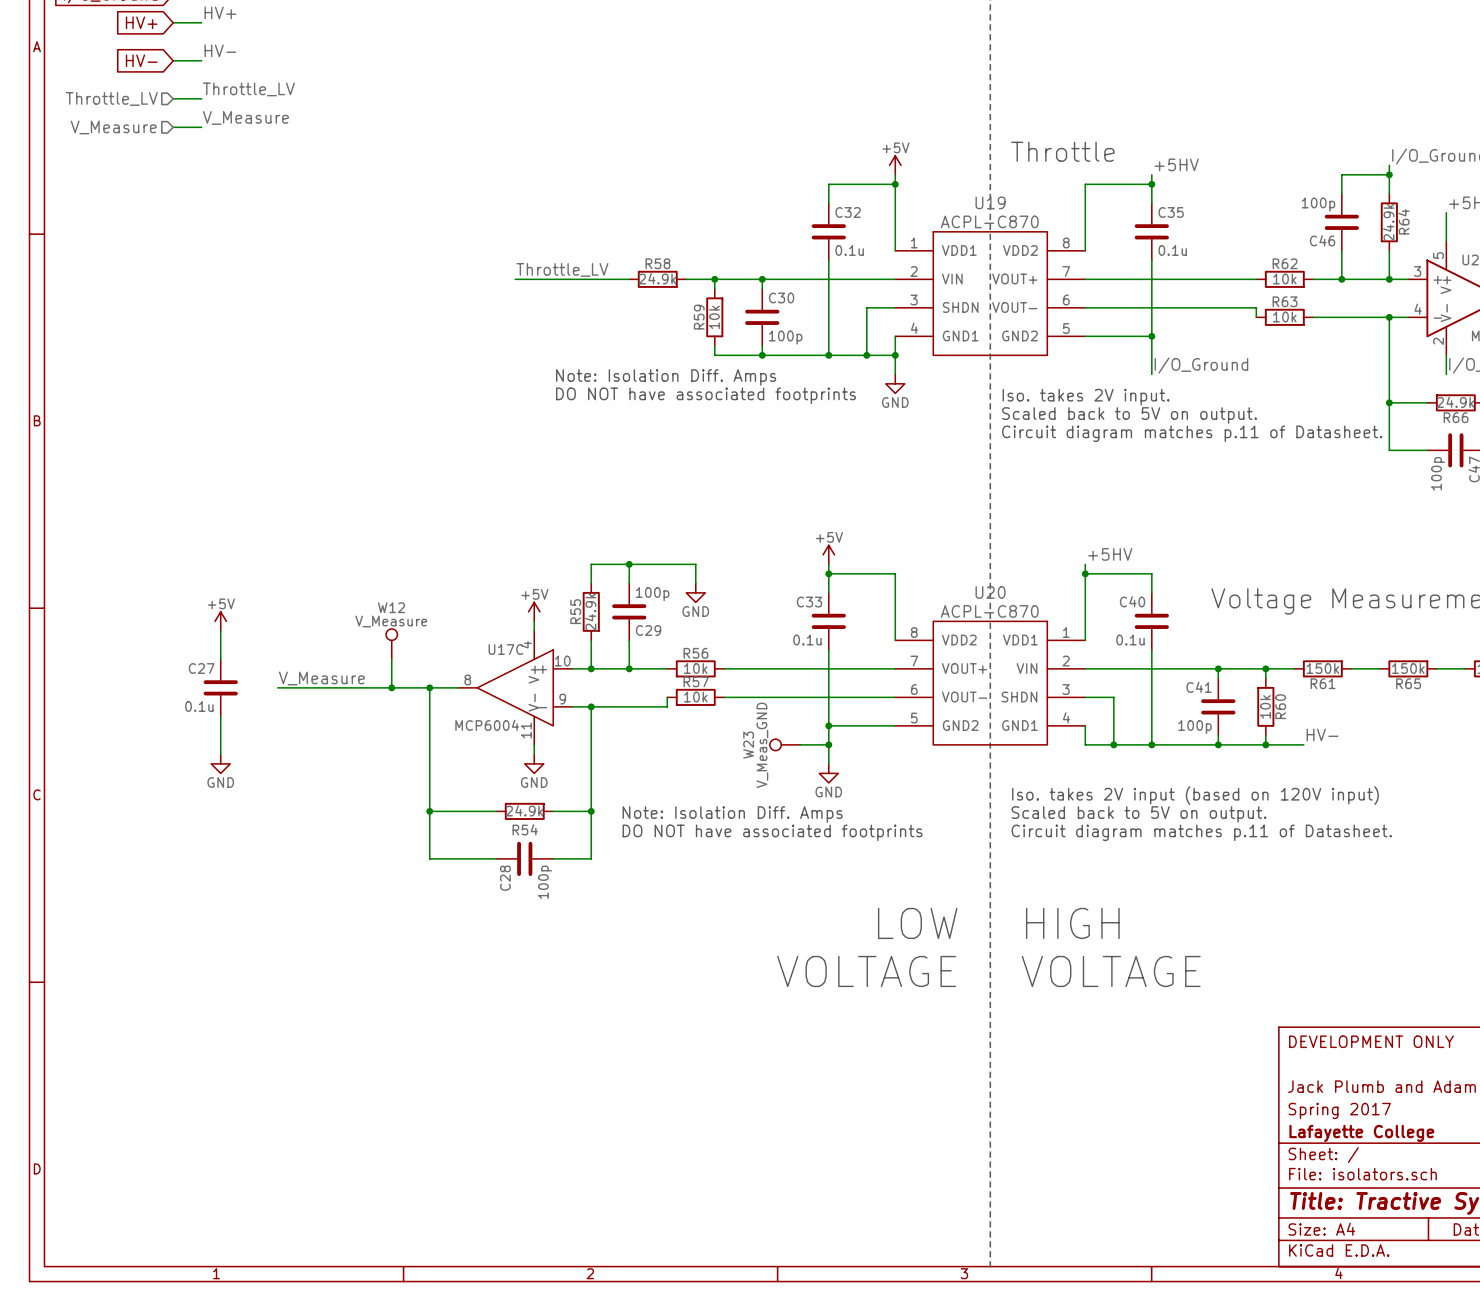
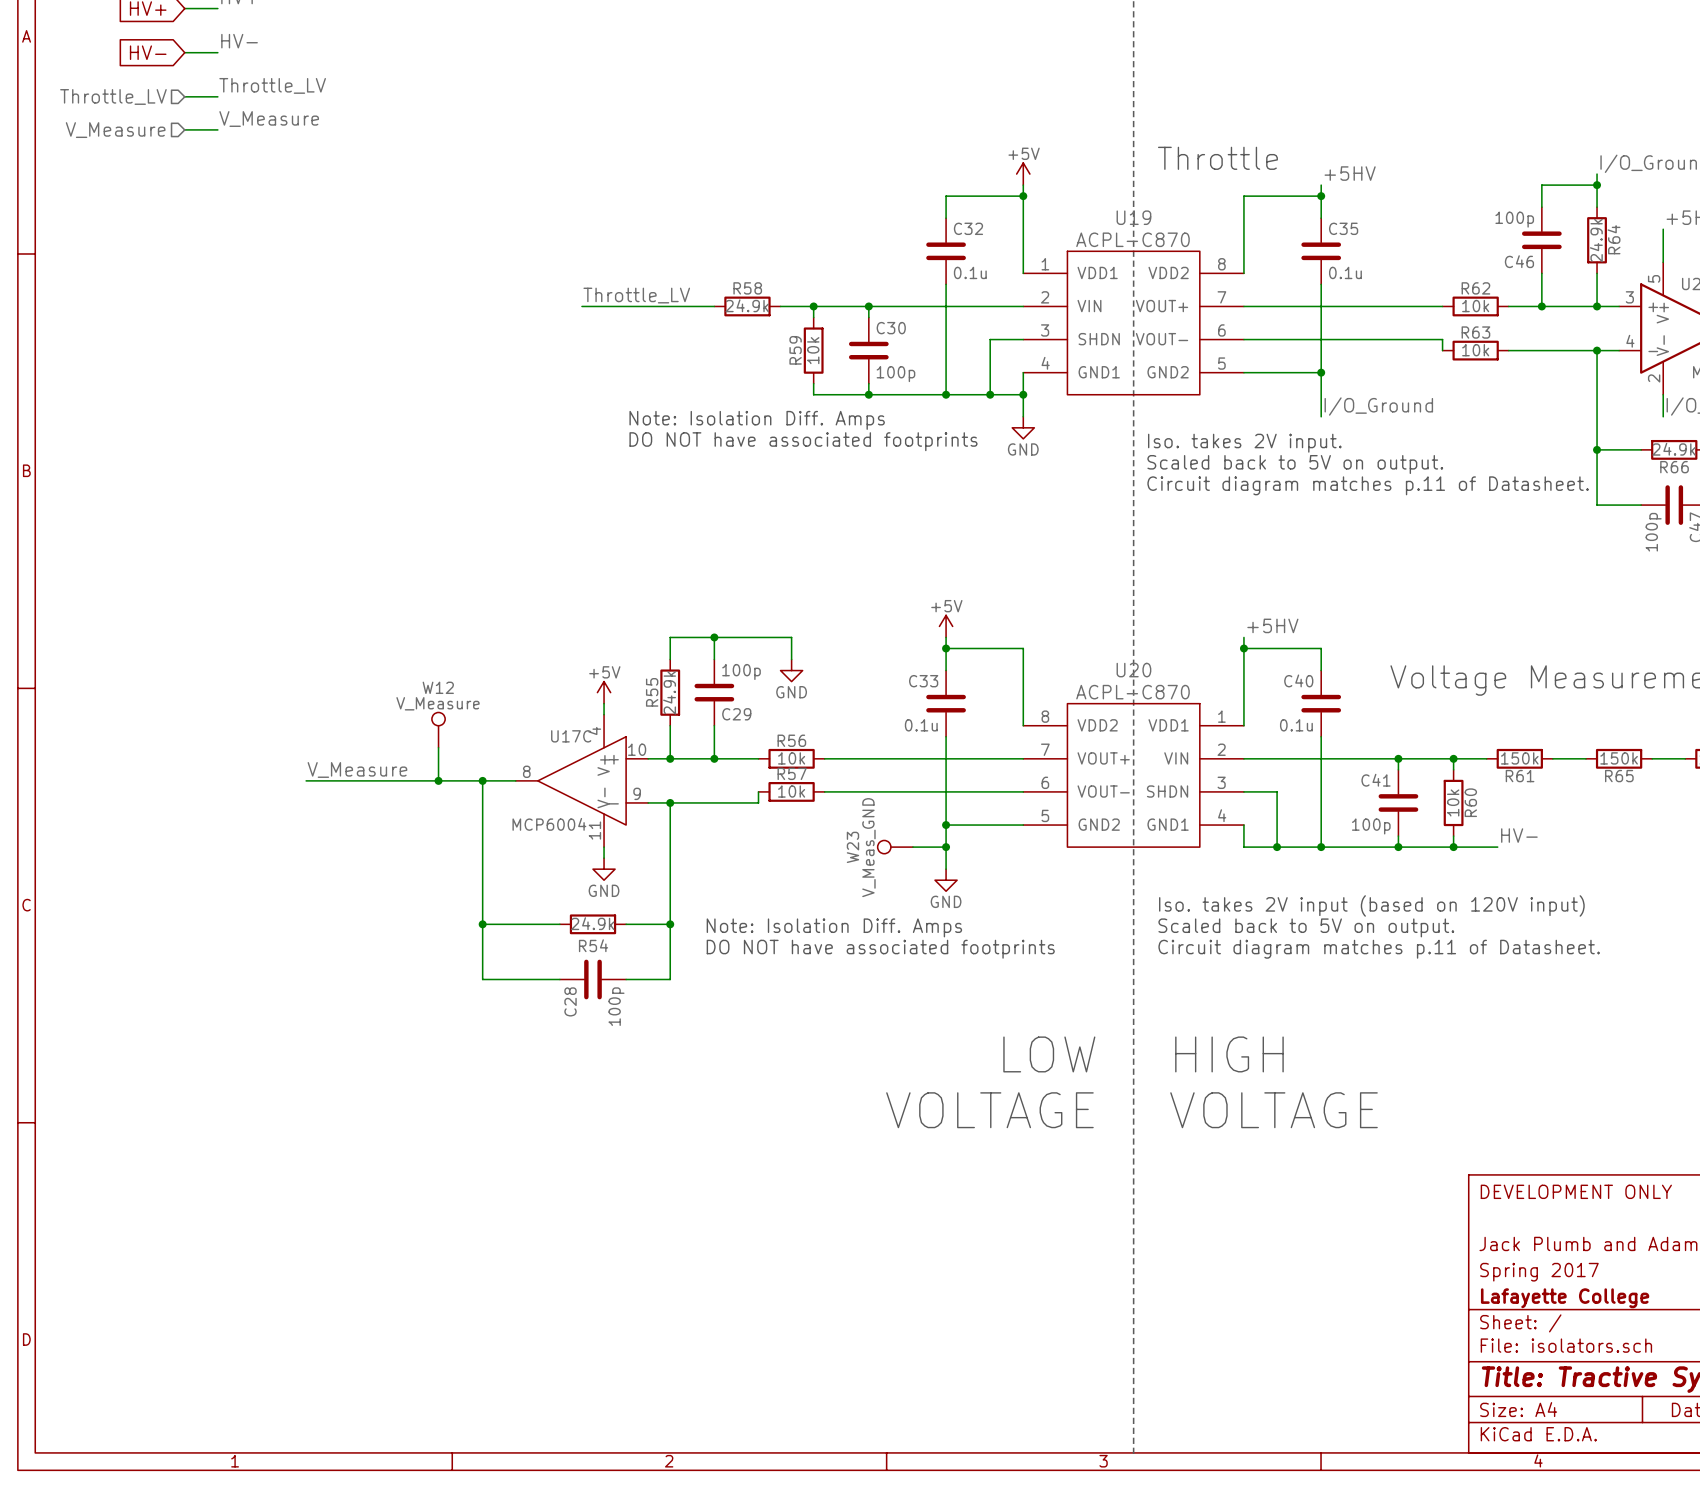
power symbol: +5V (220, 621) -> none
wire: (220, 630) (220, 659) -> none
C27: 0.1u (220, 687) -> none
wire: (220, 716) (220, 754) -> none
power symbol: GND (220, 763) -> none

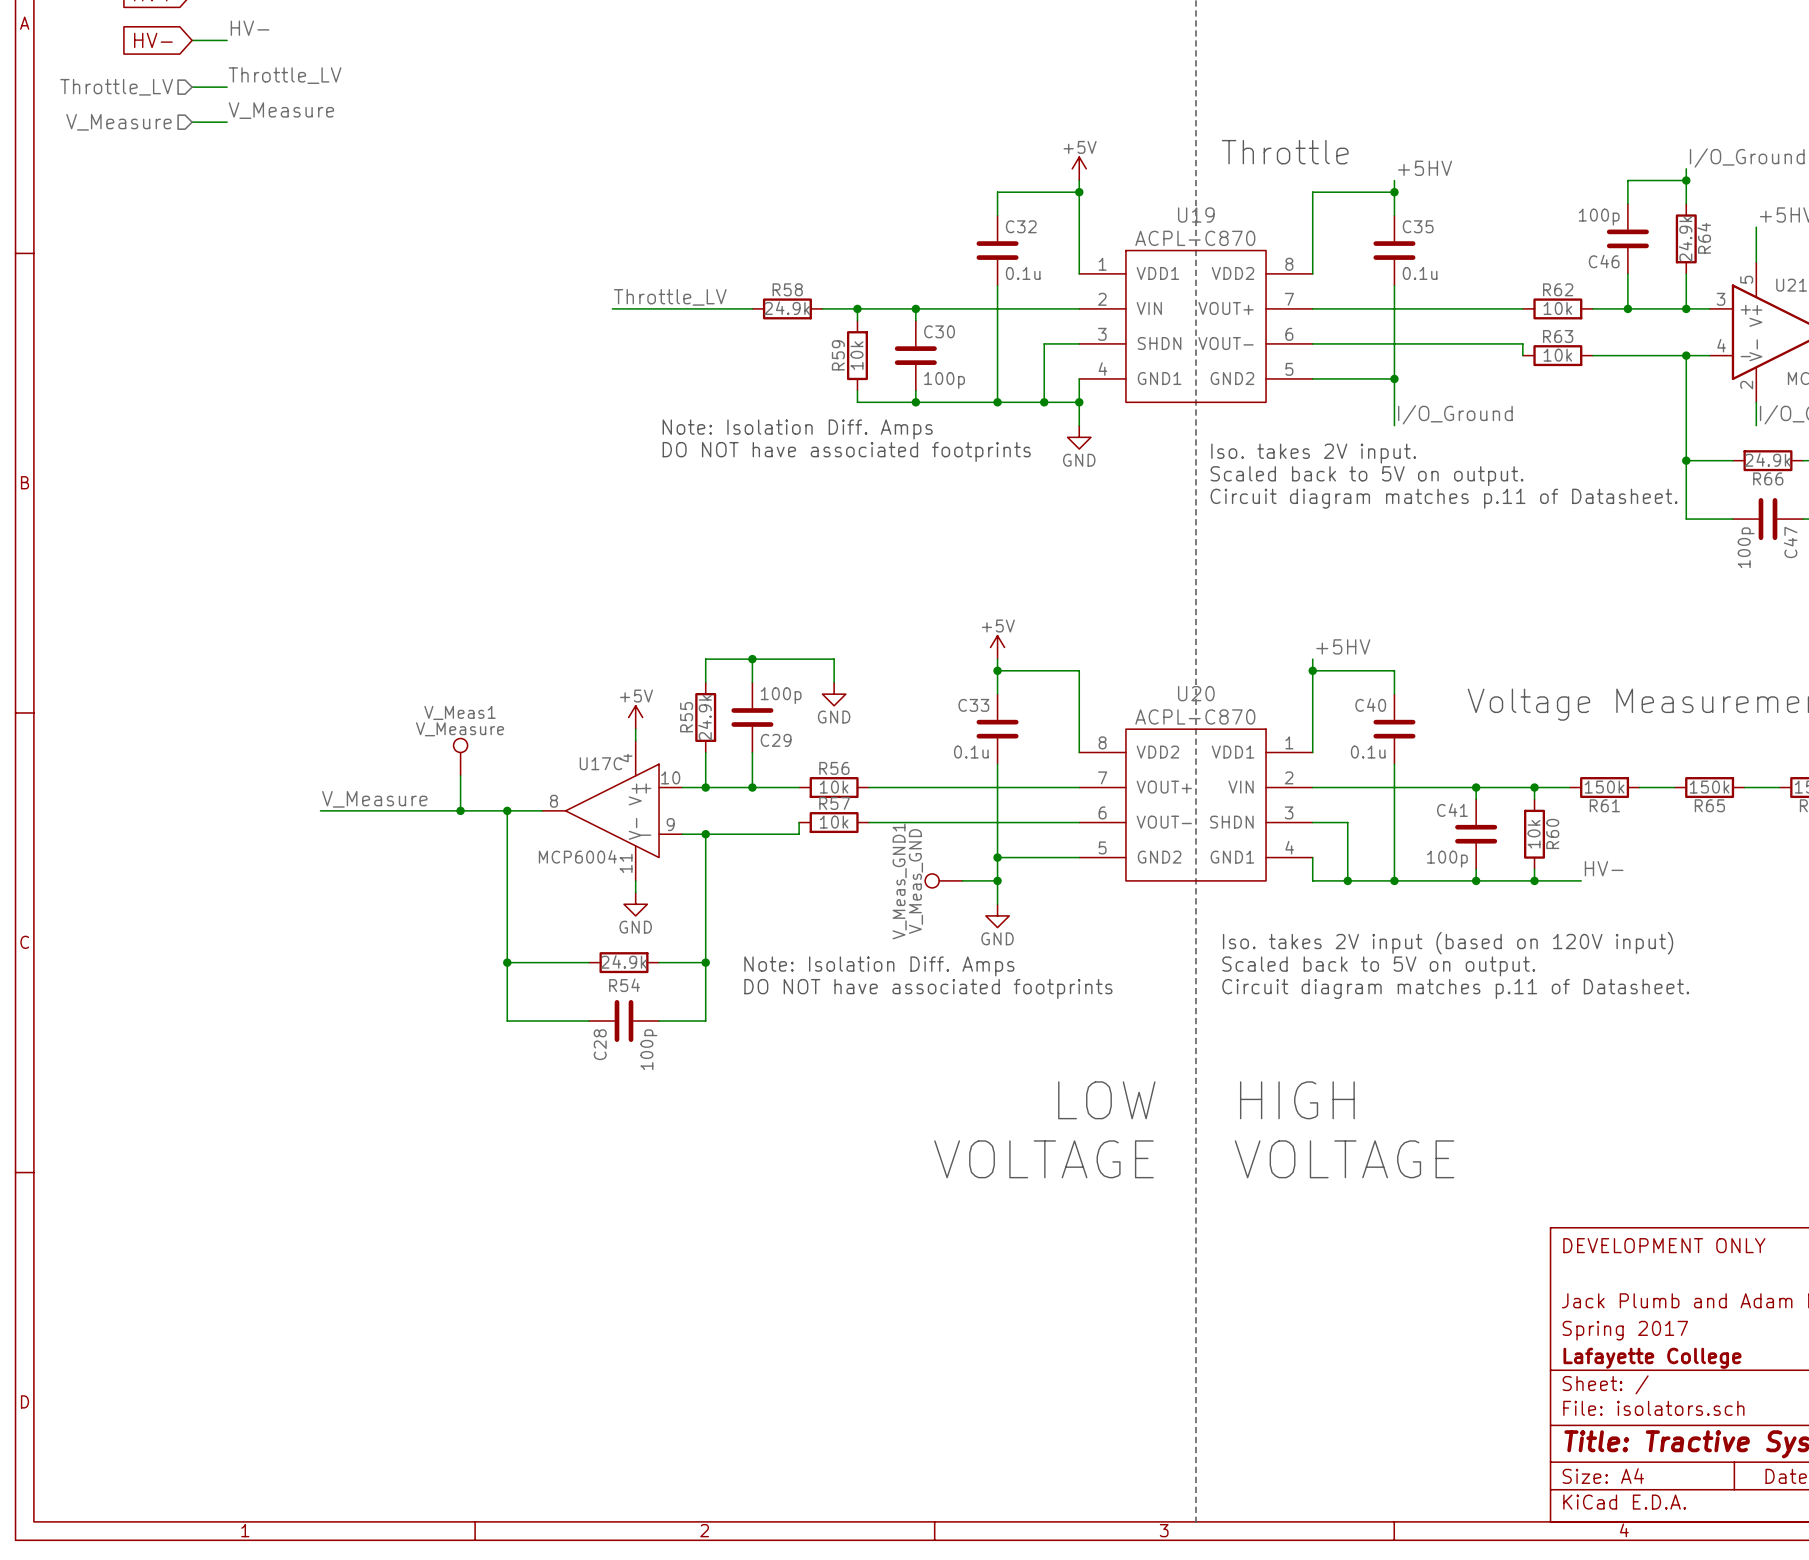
W12 name: W12 (438, 687) -> V_Meas1 (460, 712)
W23 name: W23 (852, 847) -> V_Meas_GND1 (899, 881)

